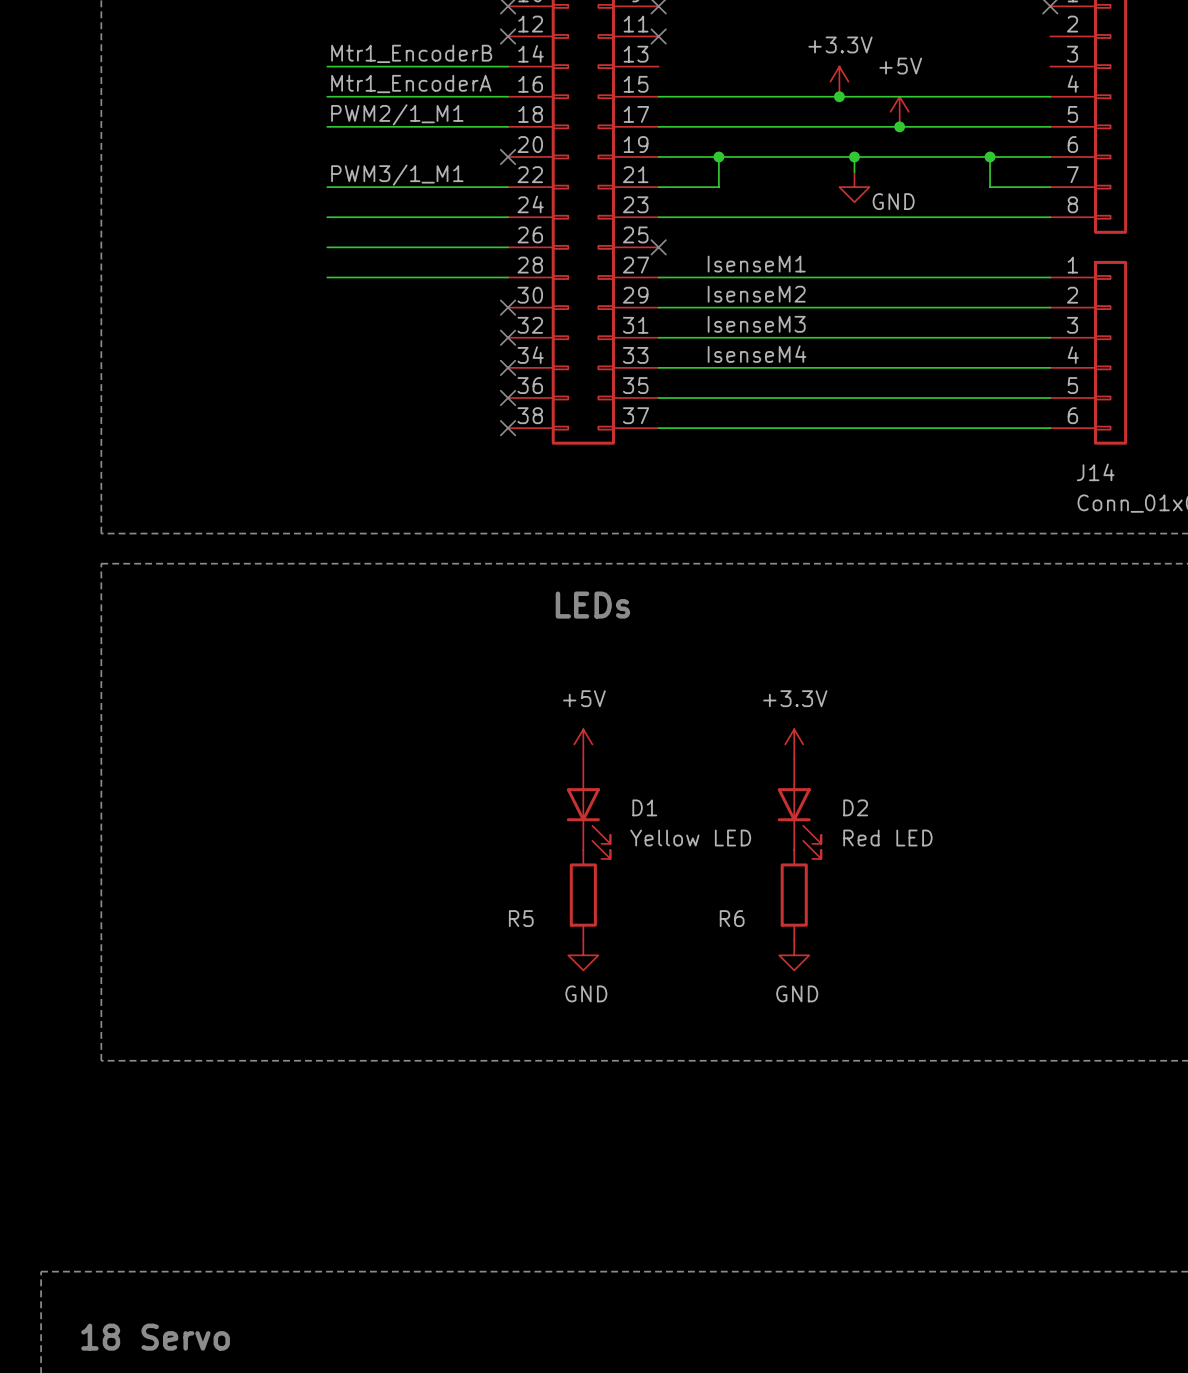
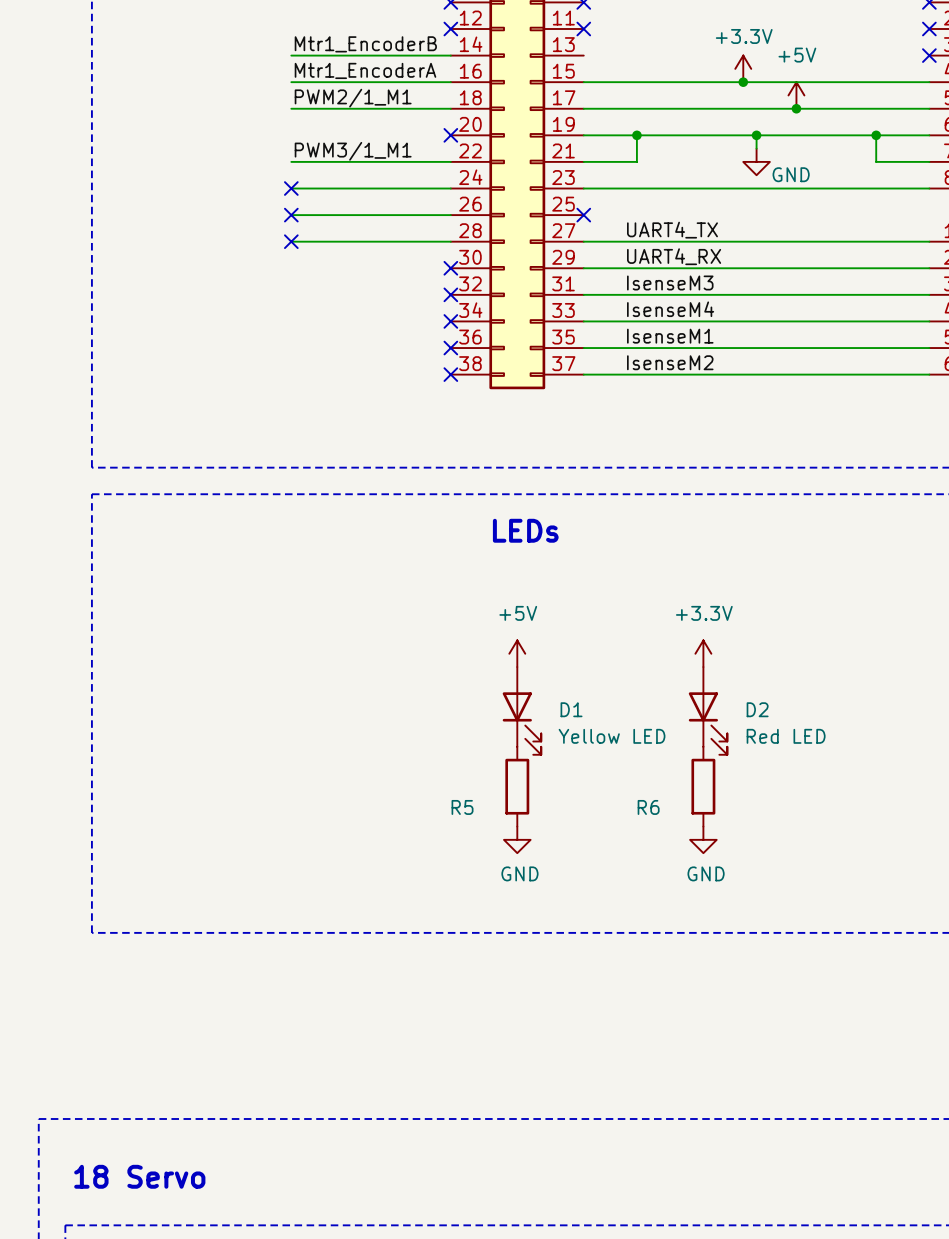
no-connect mark: none -> (929, 29)
no-connect mark: none -> (929, 55)
no-connect mark: none -> (291, 188)
no-connect mark: none -> (291, 215)
label: IsenseM1 (756, 264) -> UART4_TX (672, 230)
no-connect mark: none -> (291, 241)
label: IsenseM2 (756, 294) -> UART4_RX (674, 256)
label: none -> IsenseM1 (670, 336)
label: none -> IsenseM2 (670, 362)

